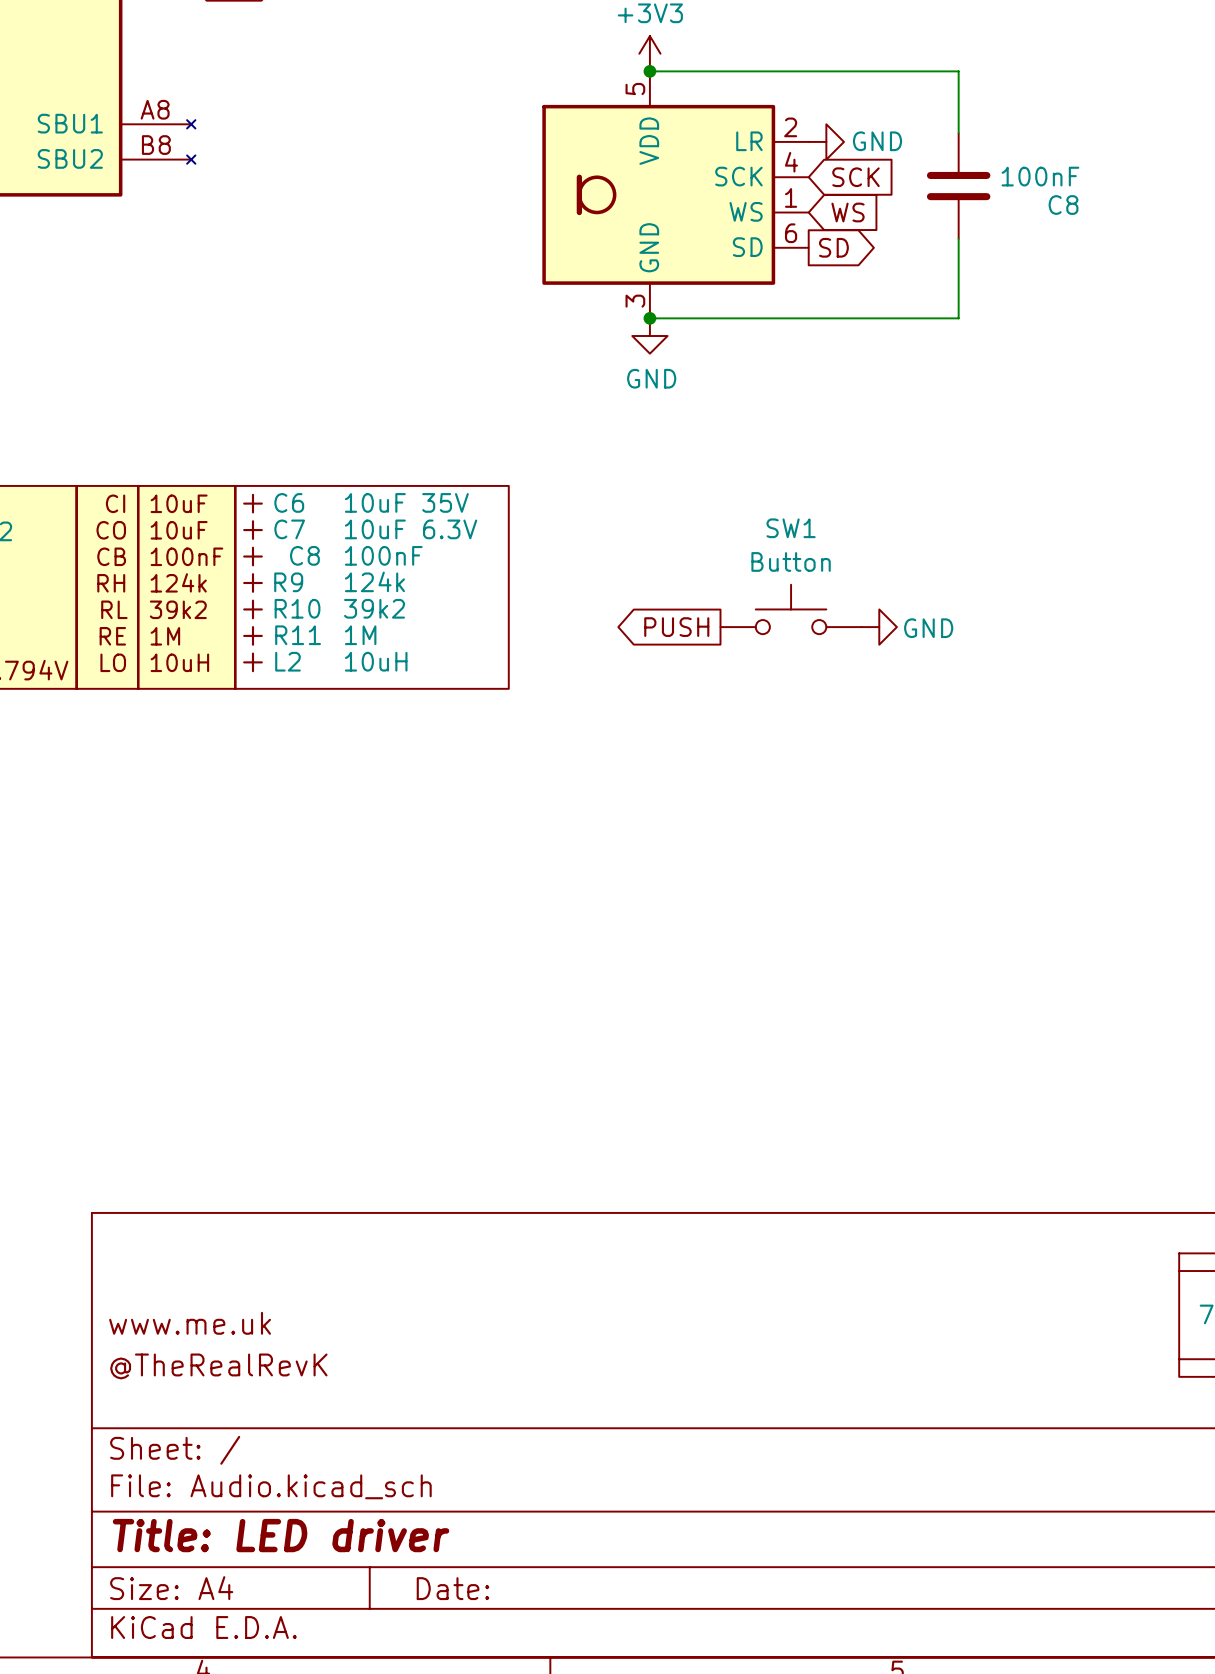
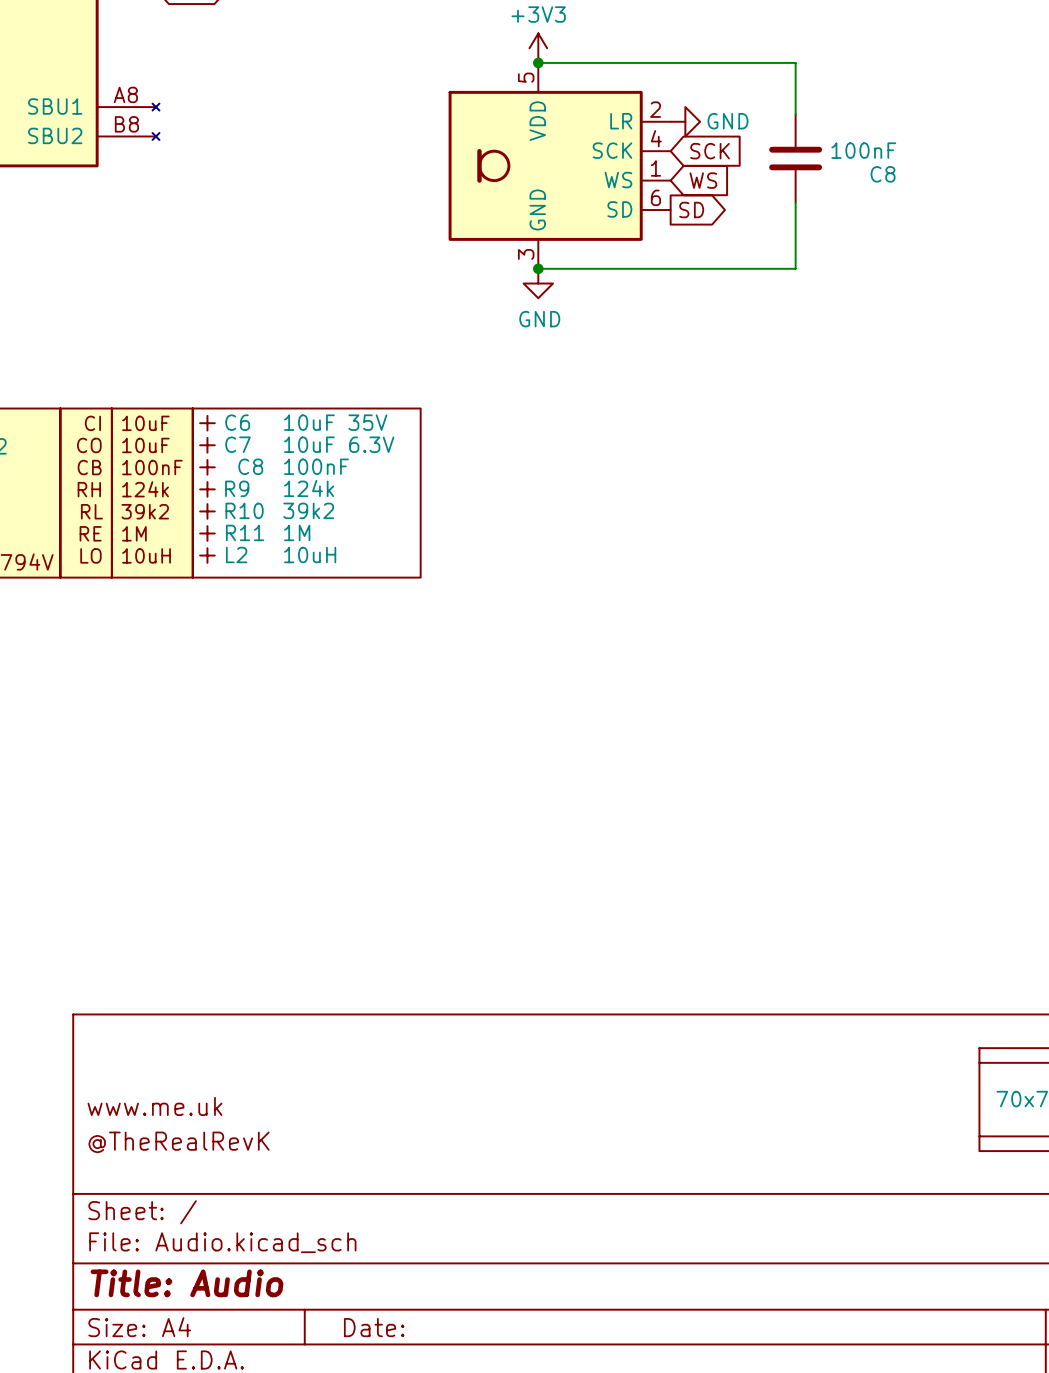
SW1: Button (791, 609) -> none
global label: PUSH (676, 627) -> none
power symbol: GND (879, 627) -> none
title block: Title: LED driver (281, 1535) -> Title: Audio (187, 1283)

